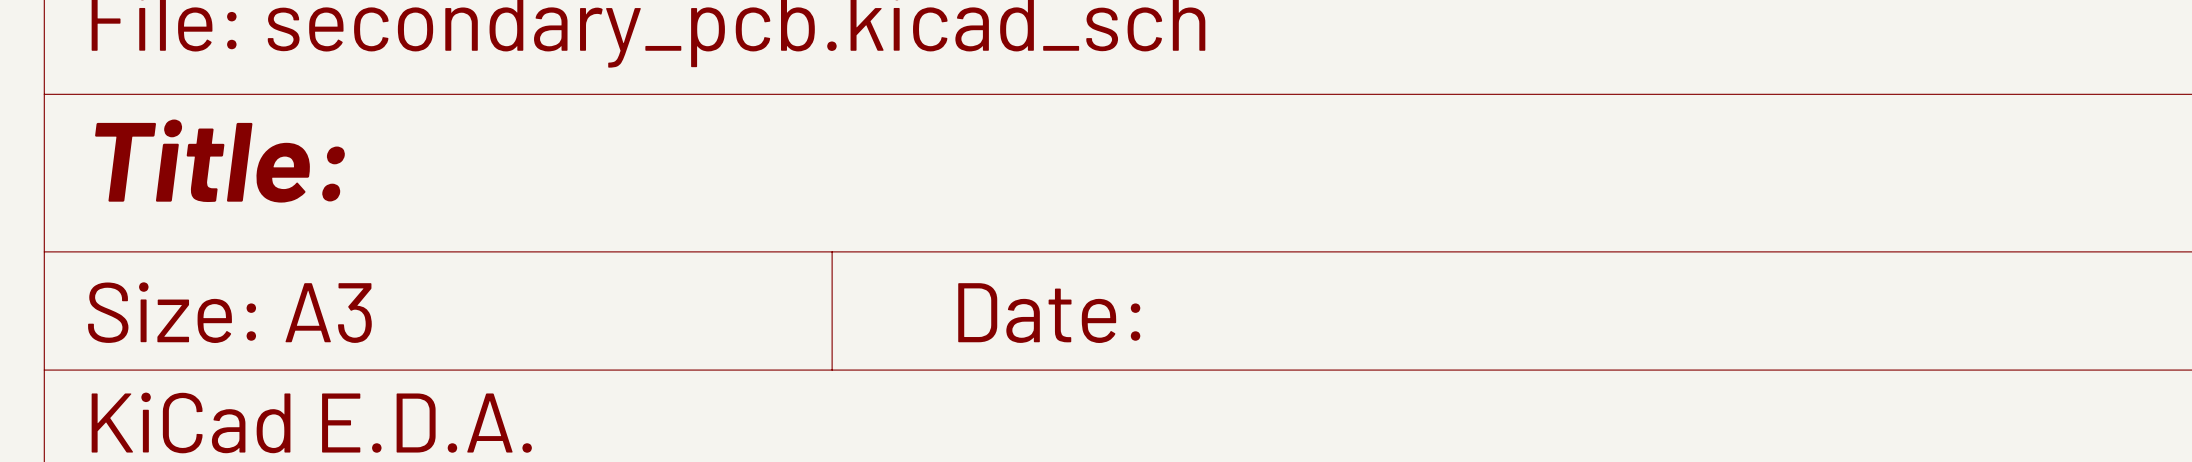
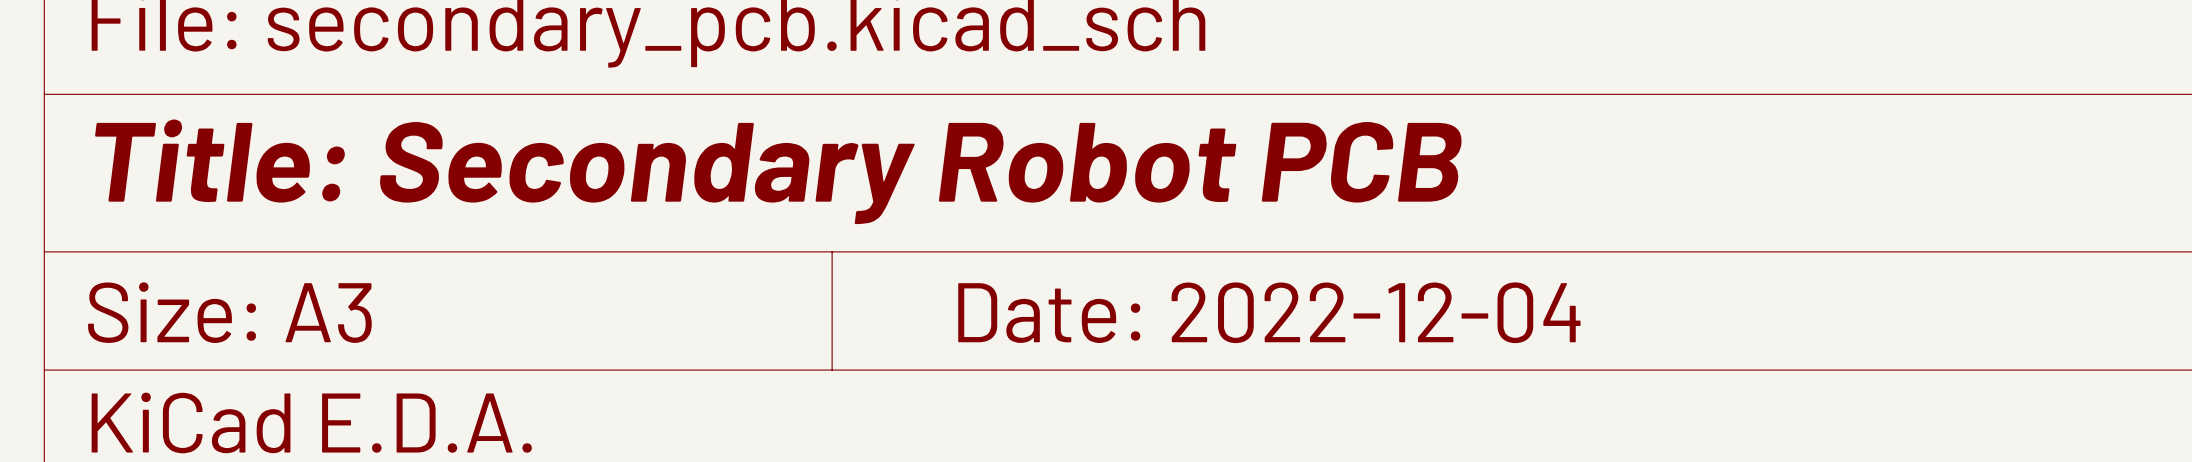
title block: Title: (220, 161) -> Title: Secondary Robot PCB (779, 171)
title block: Date: (1049, 313) -> Date: 2022-12-04 (1269, 312)

